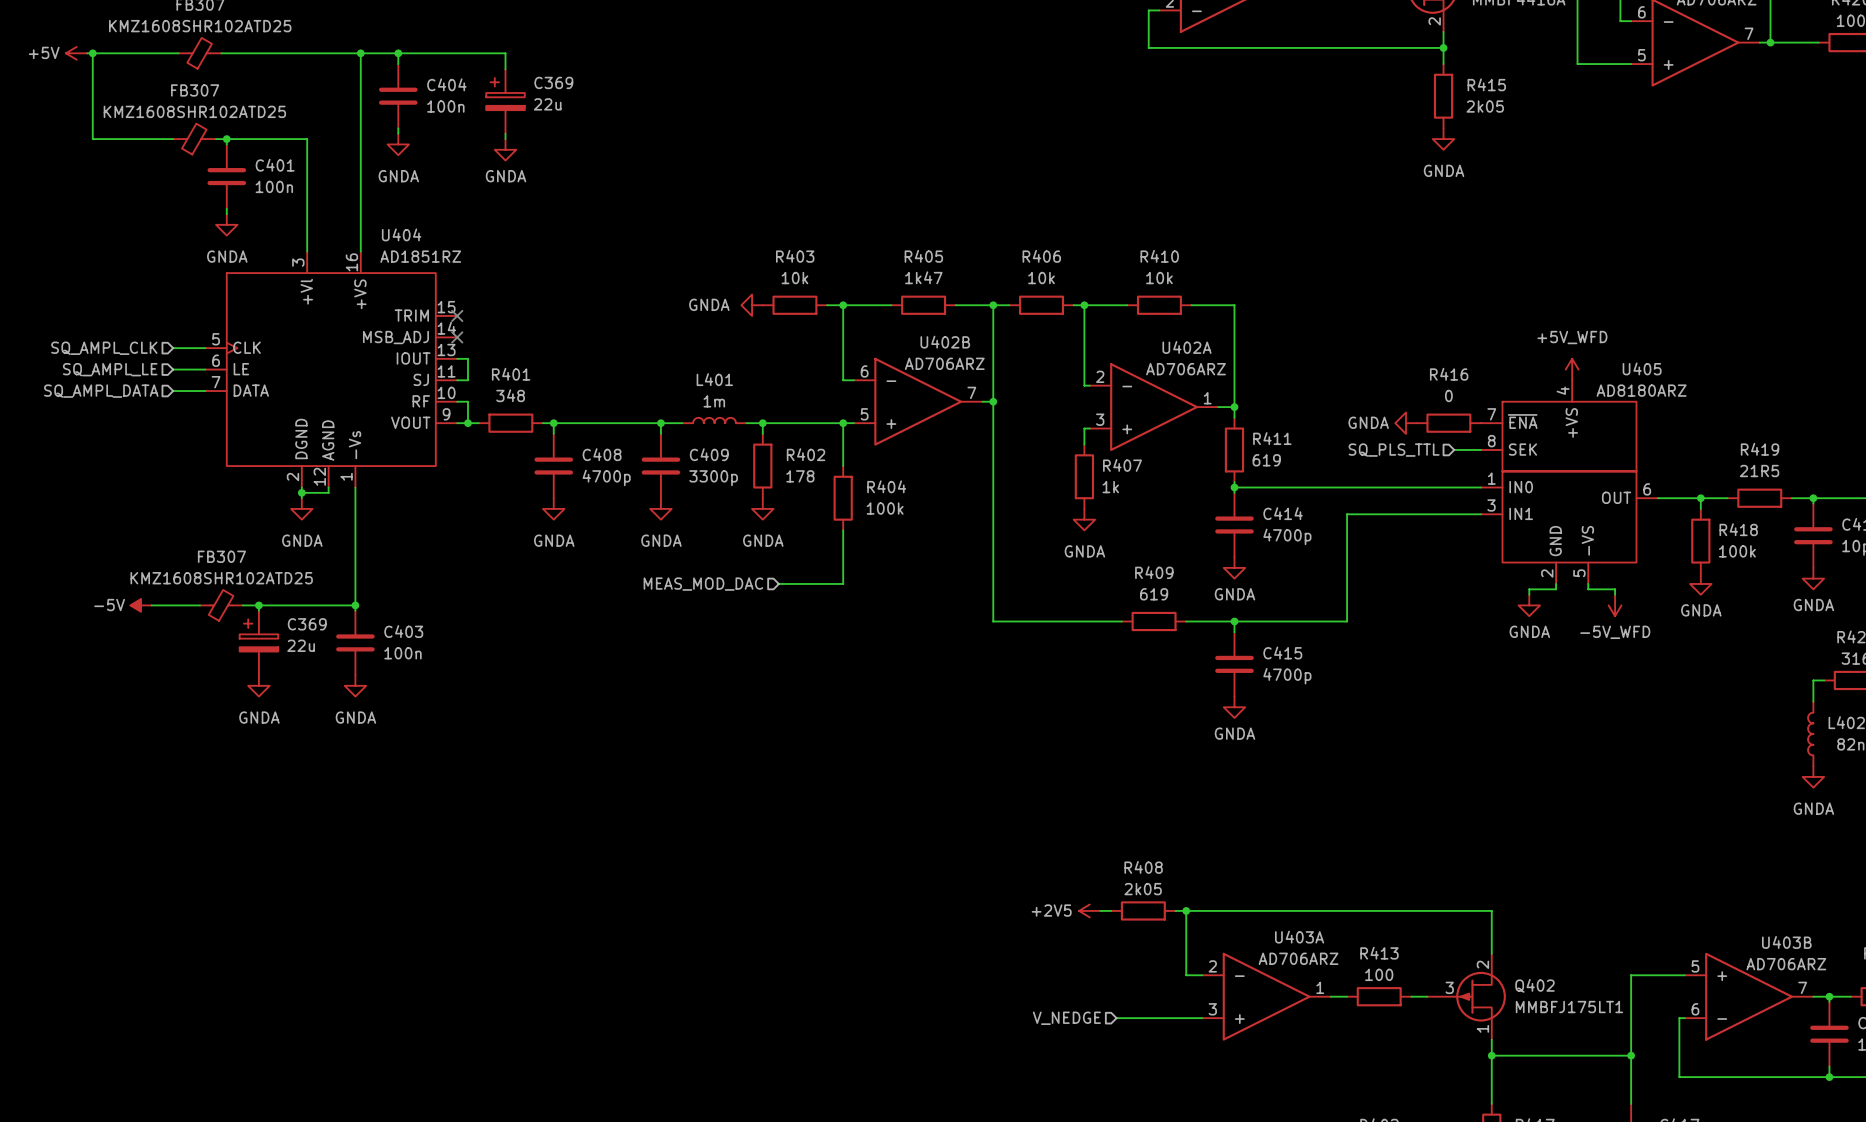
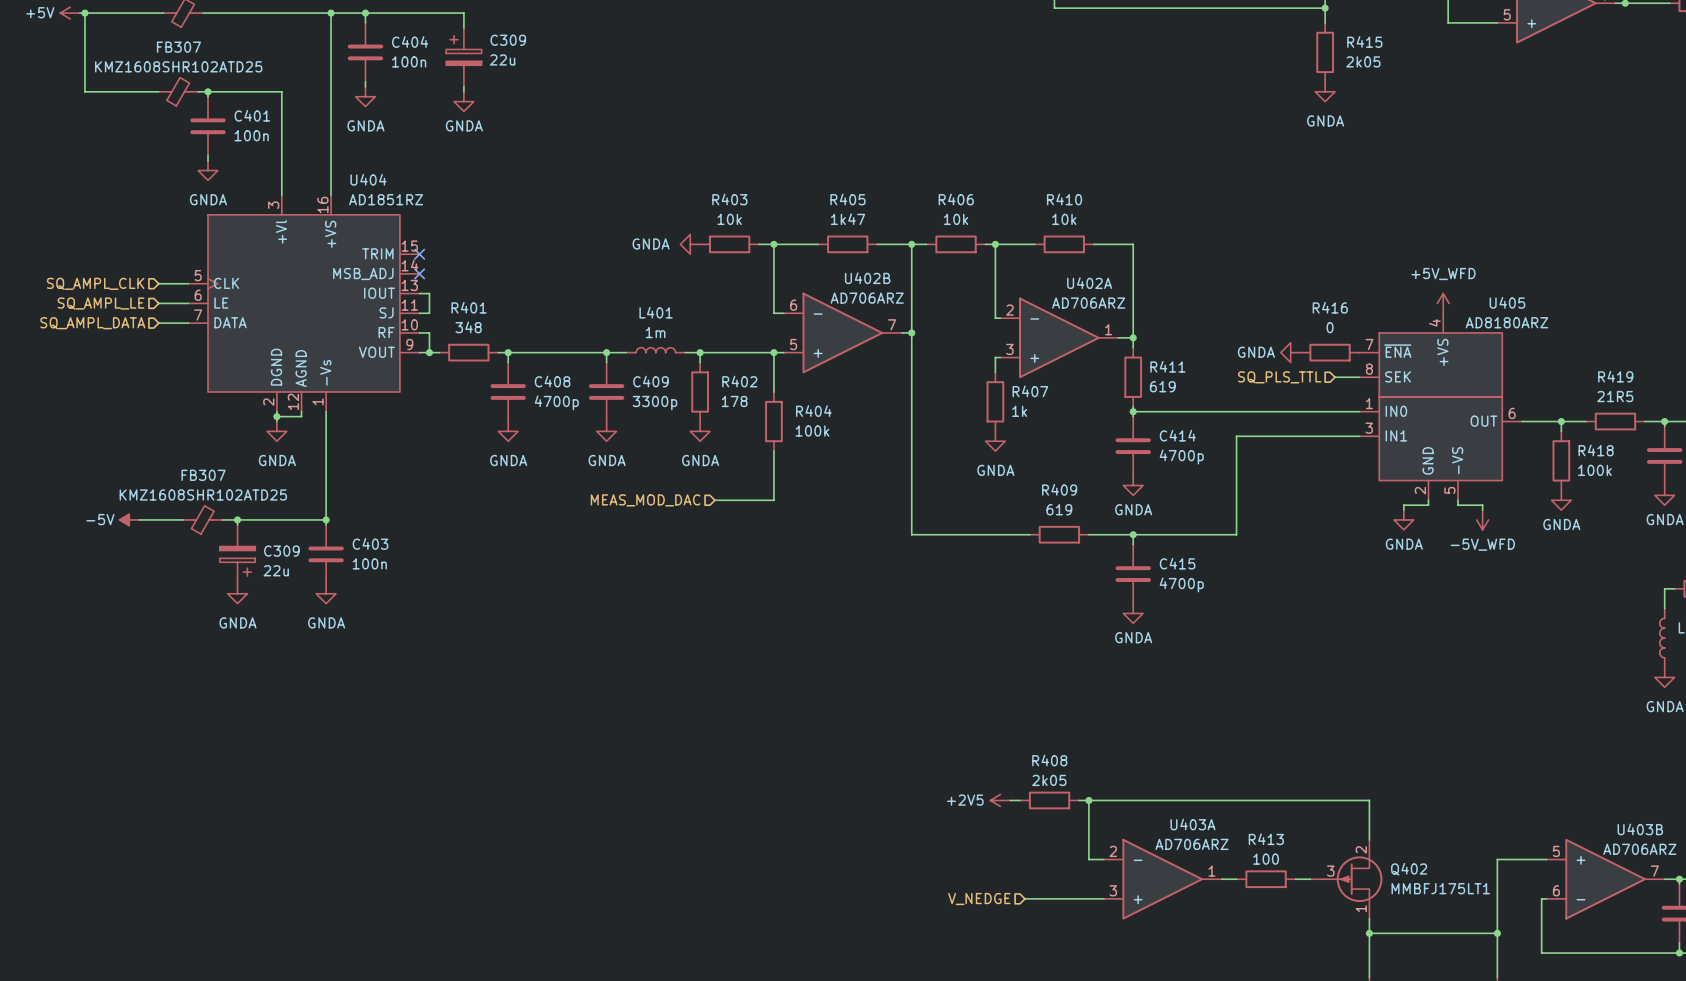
C369 name: C369 (553, 82) -> C309 (508, 40)
C369: 22u (258, 642) -> none
C309: none -> 22u (237, 554)

